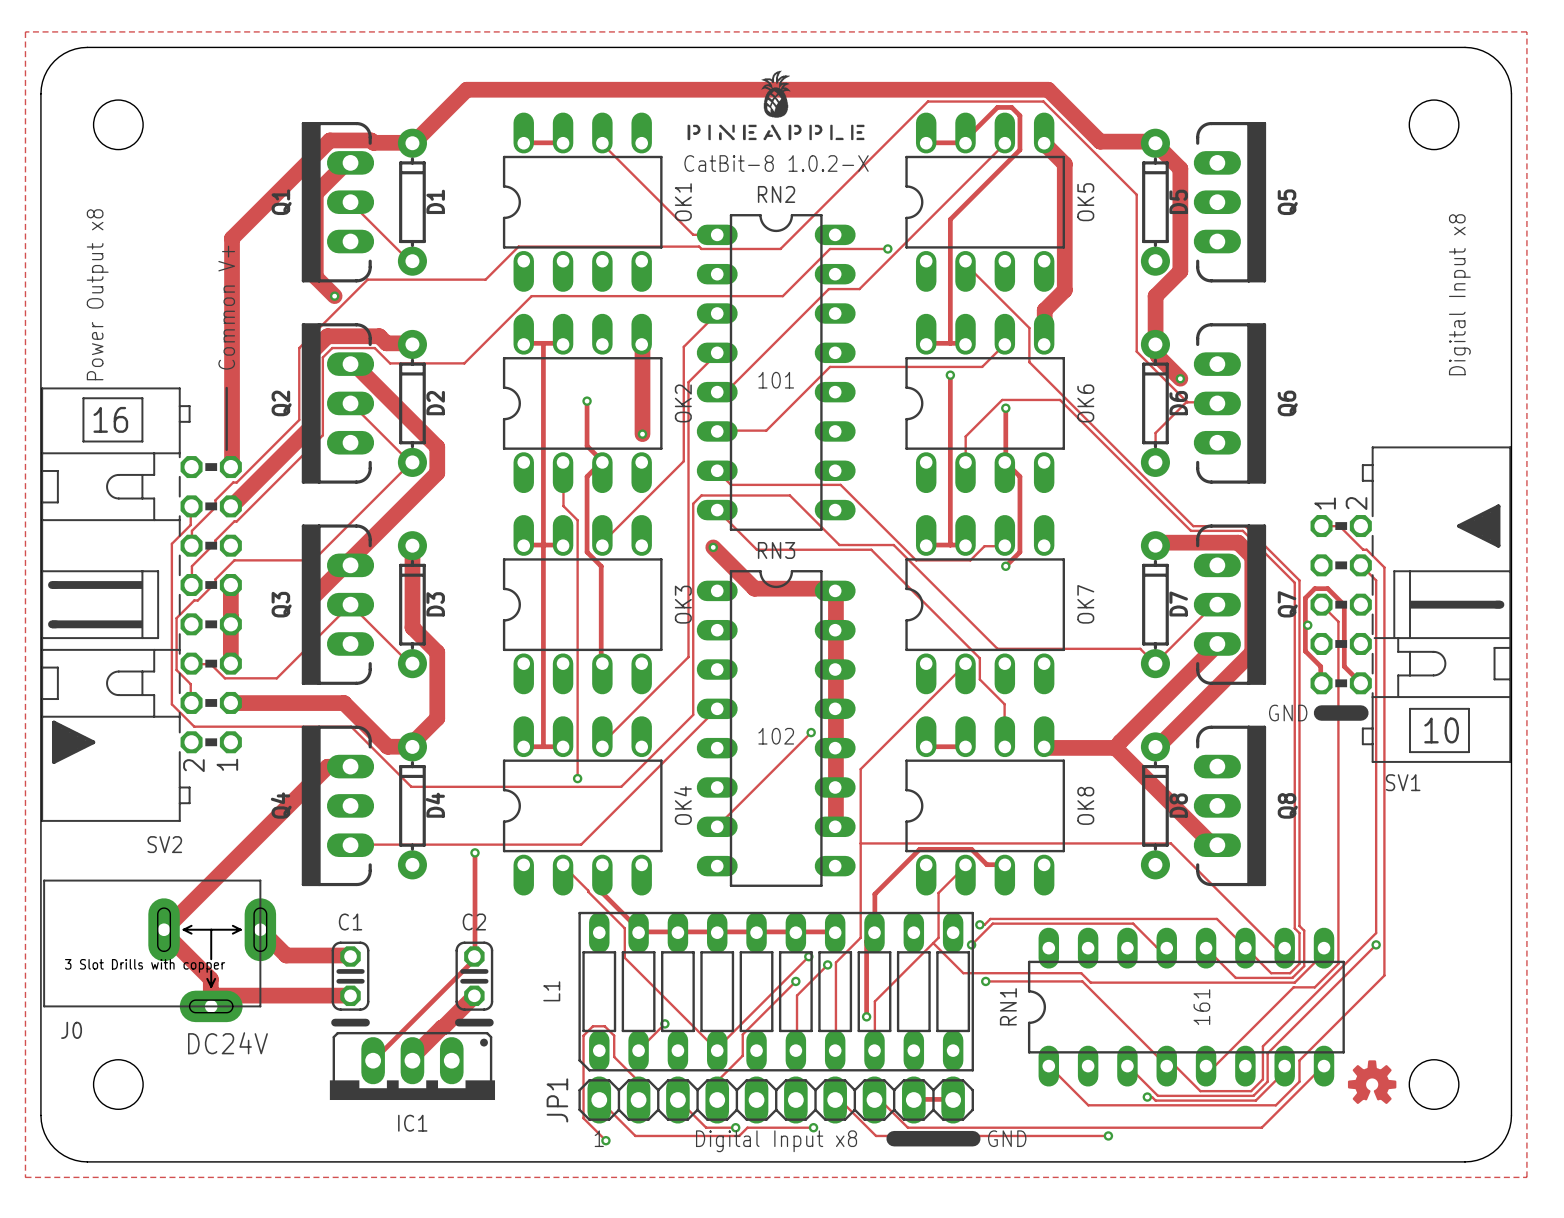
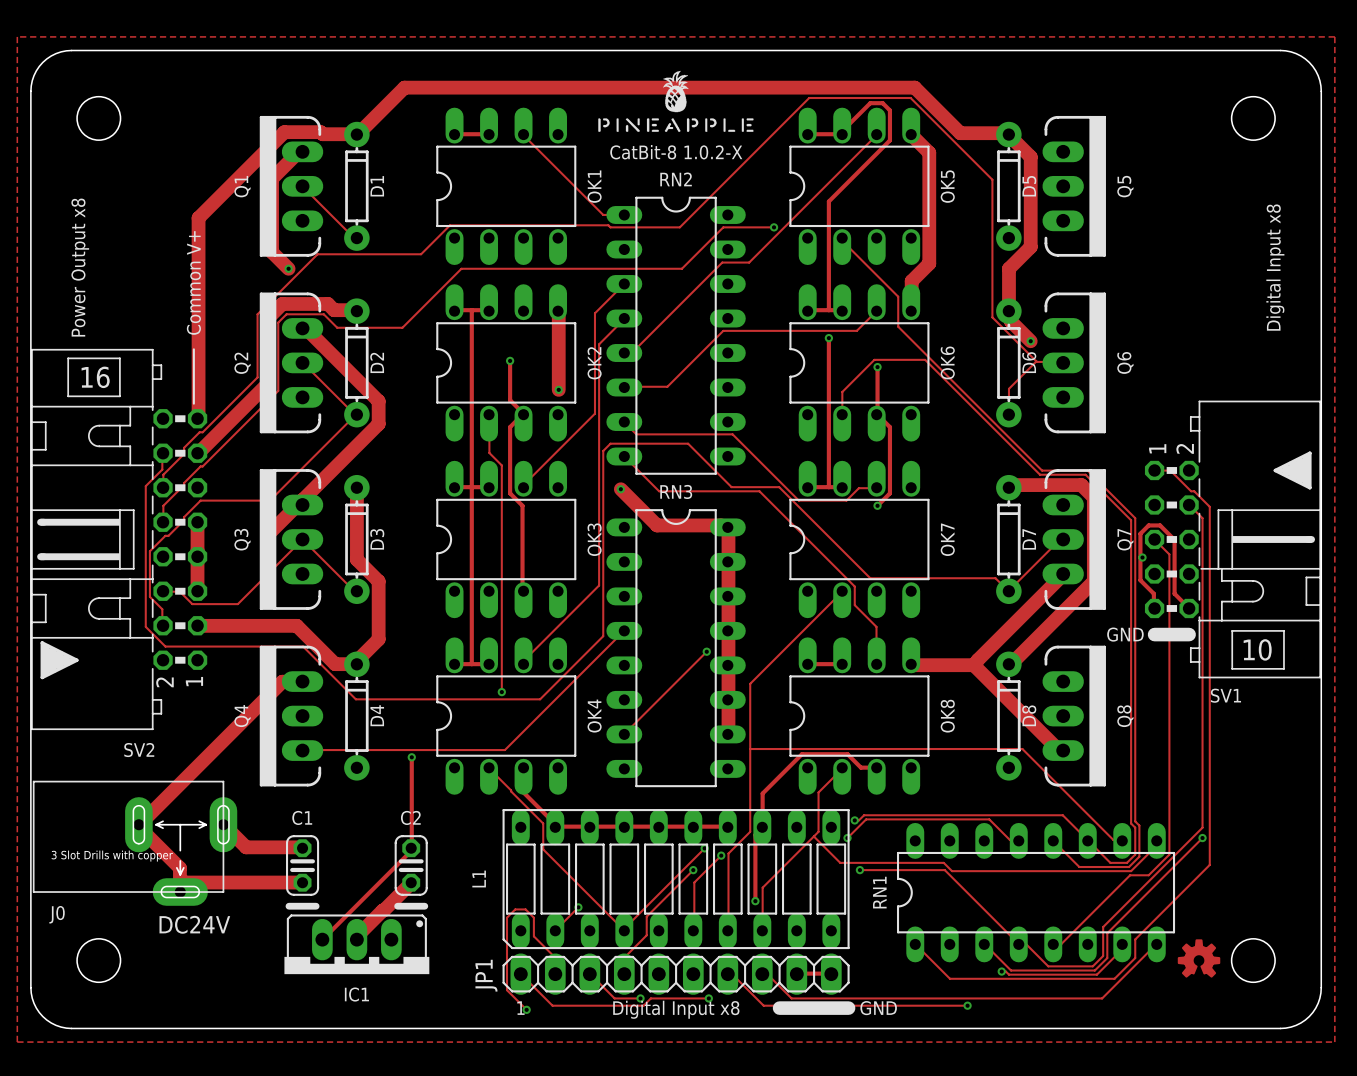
text: 101 (776, 380) -> none
text: 102 (776, 736) -> none
text: 161 (1201, 1007) -> none

